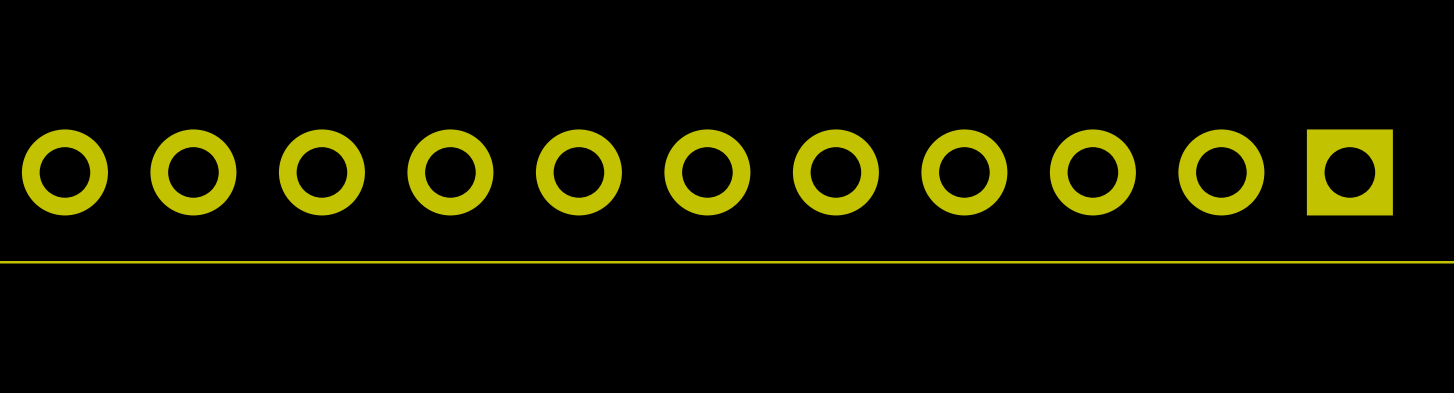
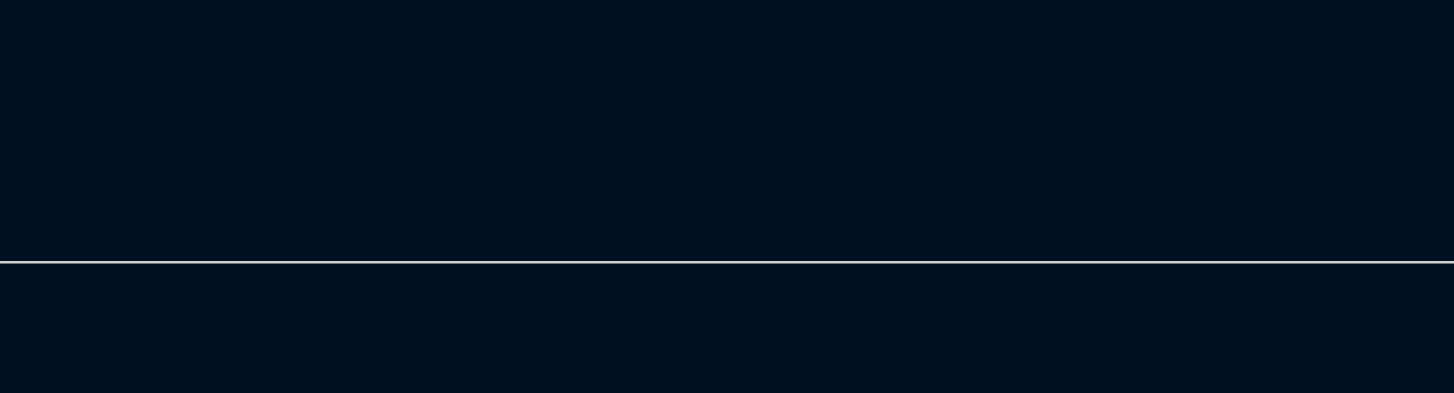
part: (707, 172) -> none

